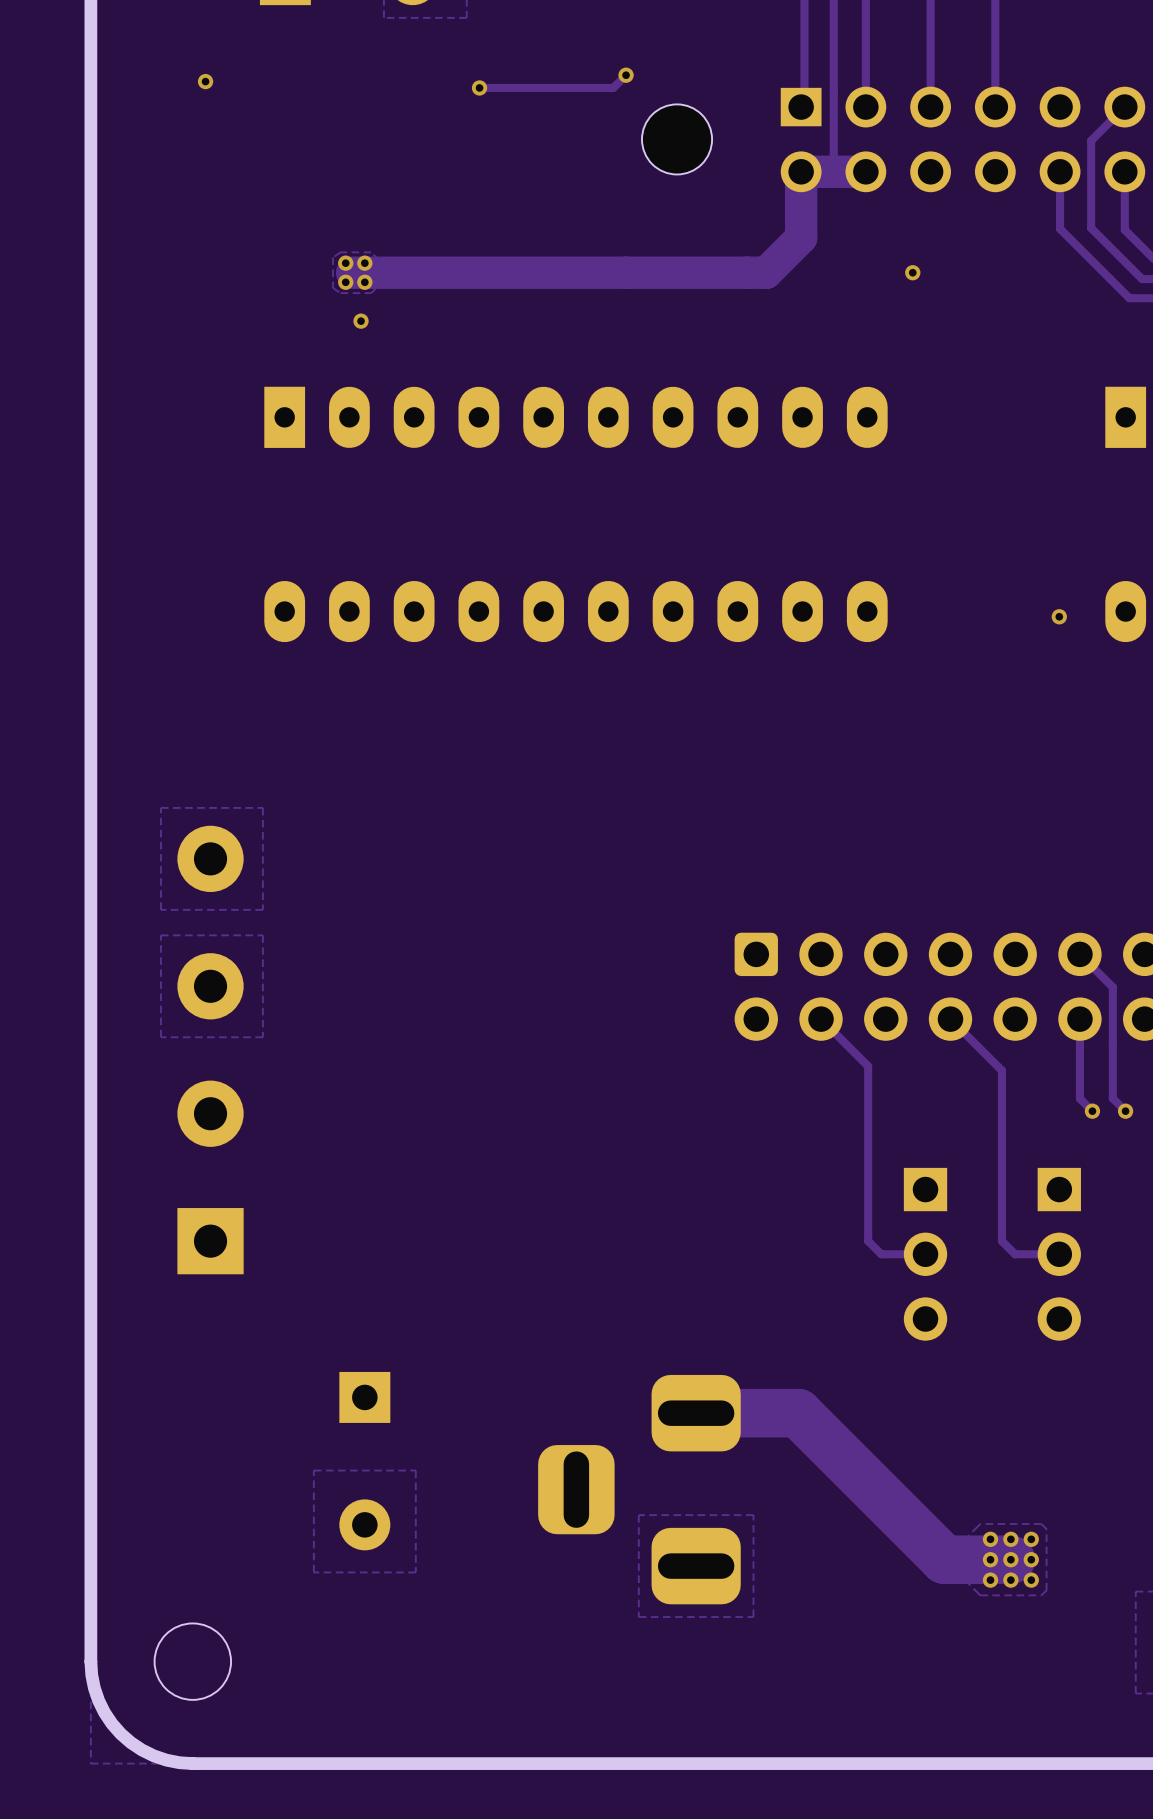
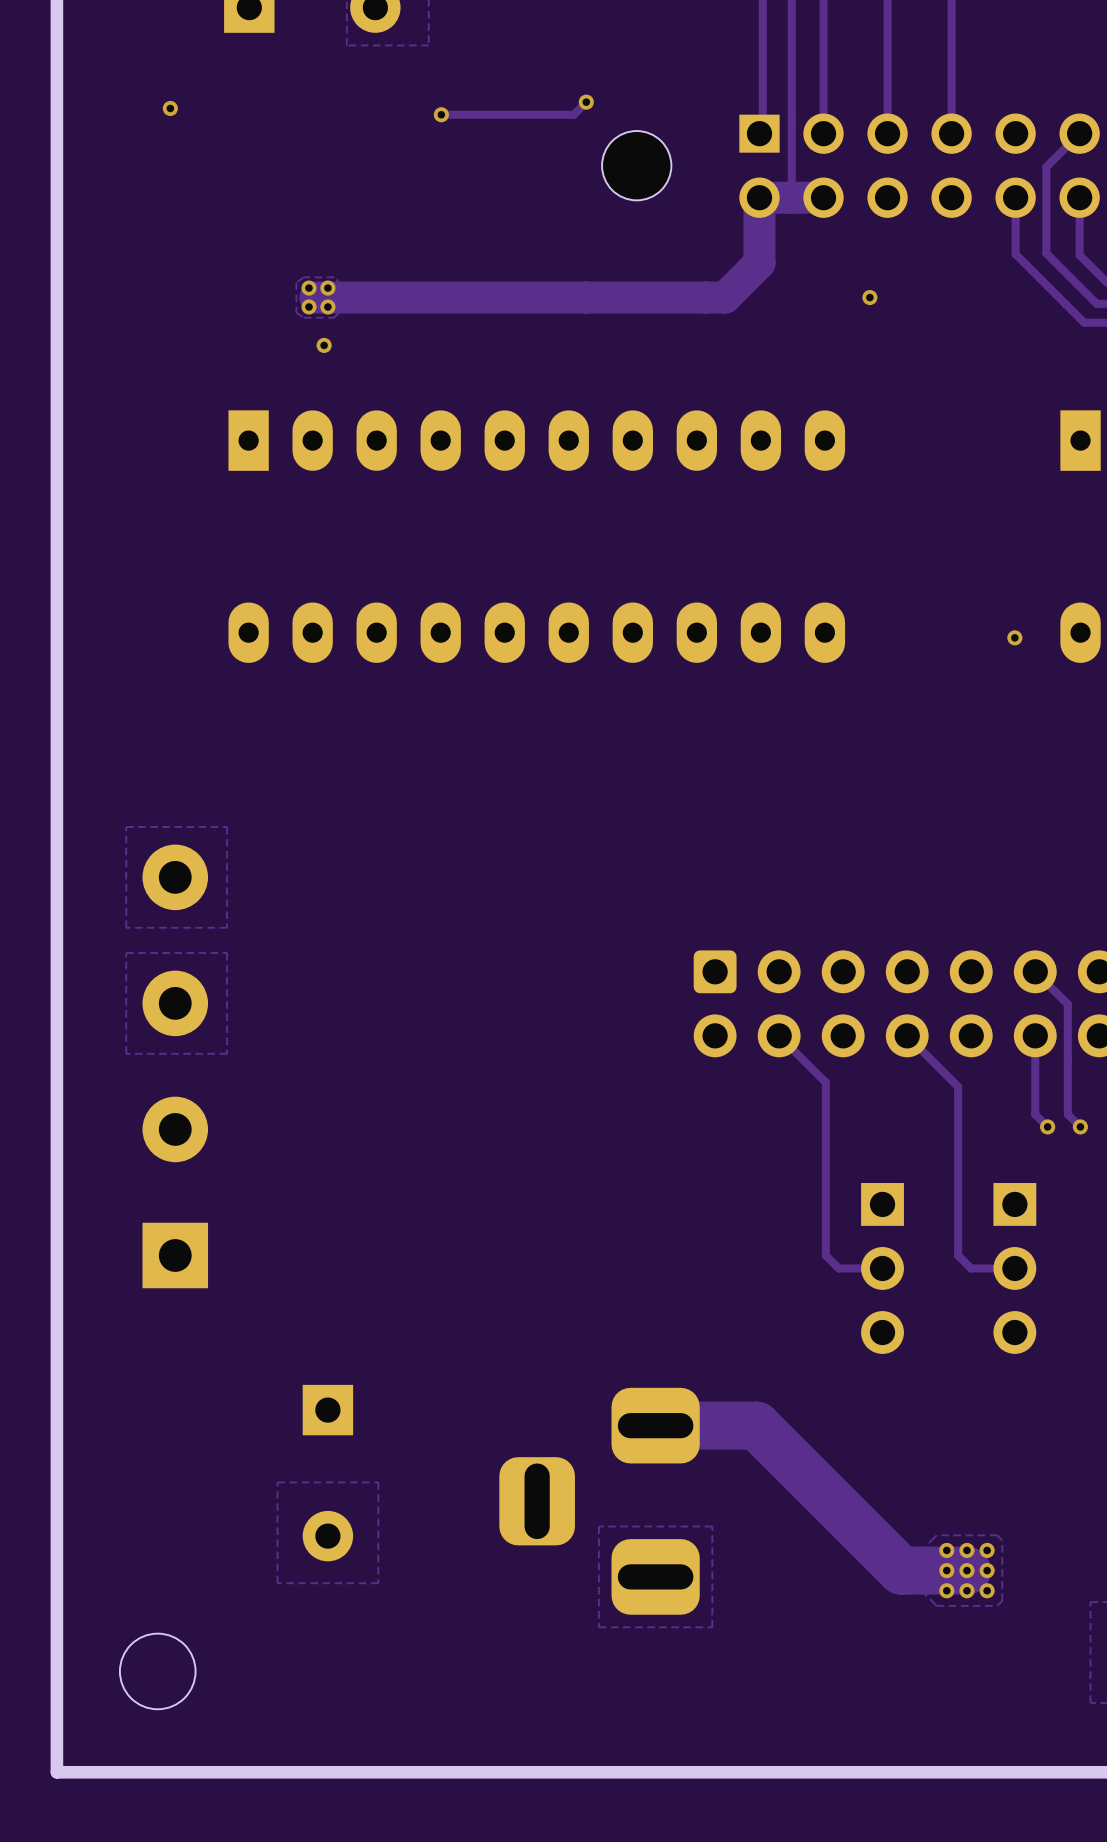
board edge: (90, 1661) (91, 1674) (98, 1700) (104, 1712) (120, 1733) (141, 1749) (153, 1755) (166, 1760) (192, 1763) -> (56, 1671) (56, 1772) (157, 1772)

